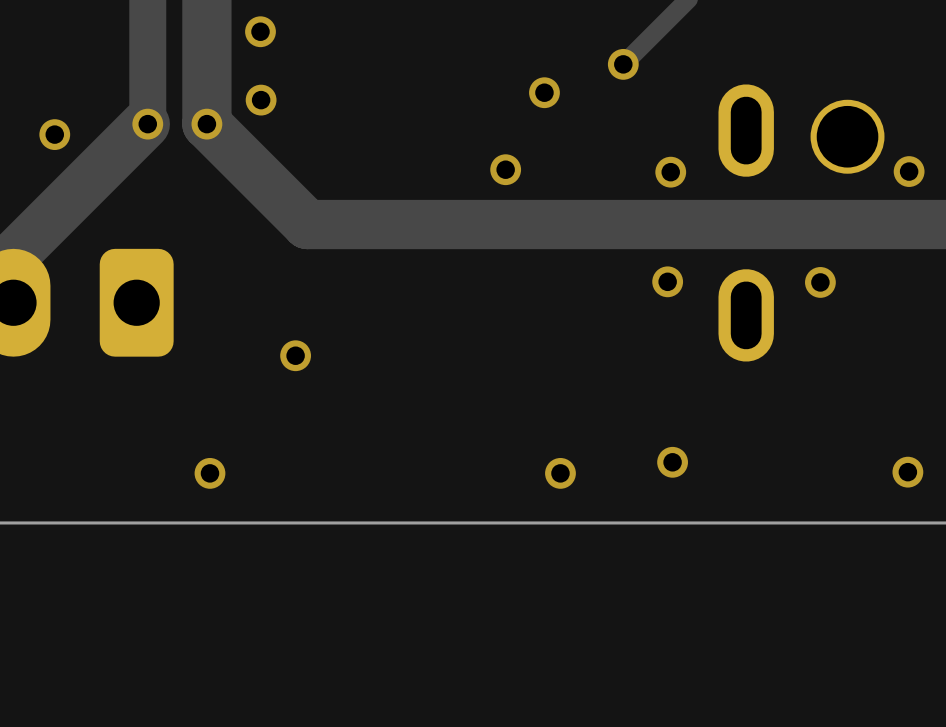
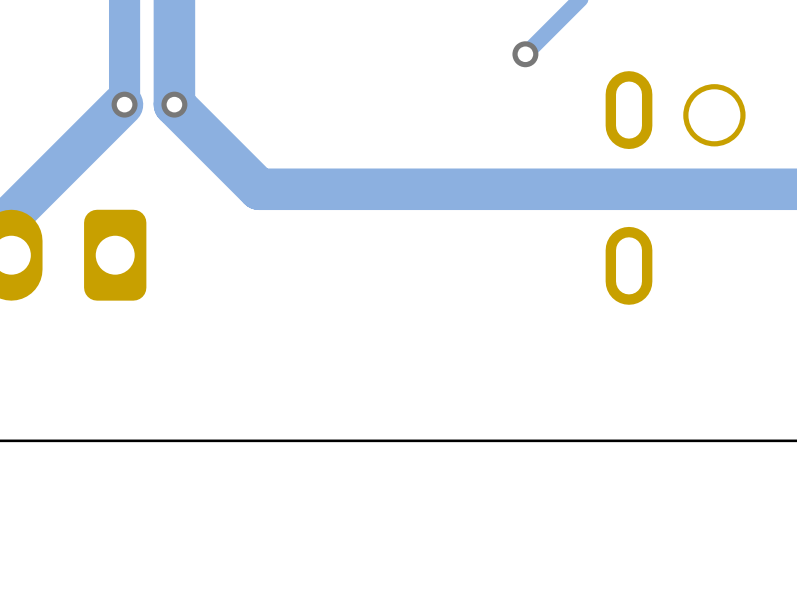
via: (260, 31) -> none
via: (544, 92) -> none
via: (261, 100) -> none
via: (54, 134) -> none
via: (505, 169) -> none
via: (909, 171) -> none
via: (670, 172) -> none
via: (667, 281) -> none
via: (820, 282) -> none
via: (295, 355) -> none
via: (672, 462) -> none
via: (907, 472) -> none
via: (209, 473) -> none
via: (560, 473) -> none

